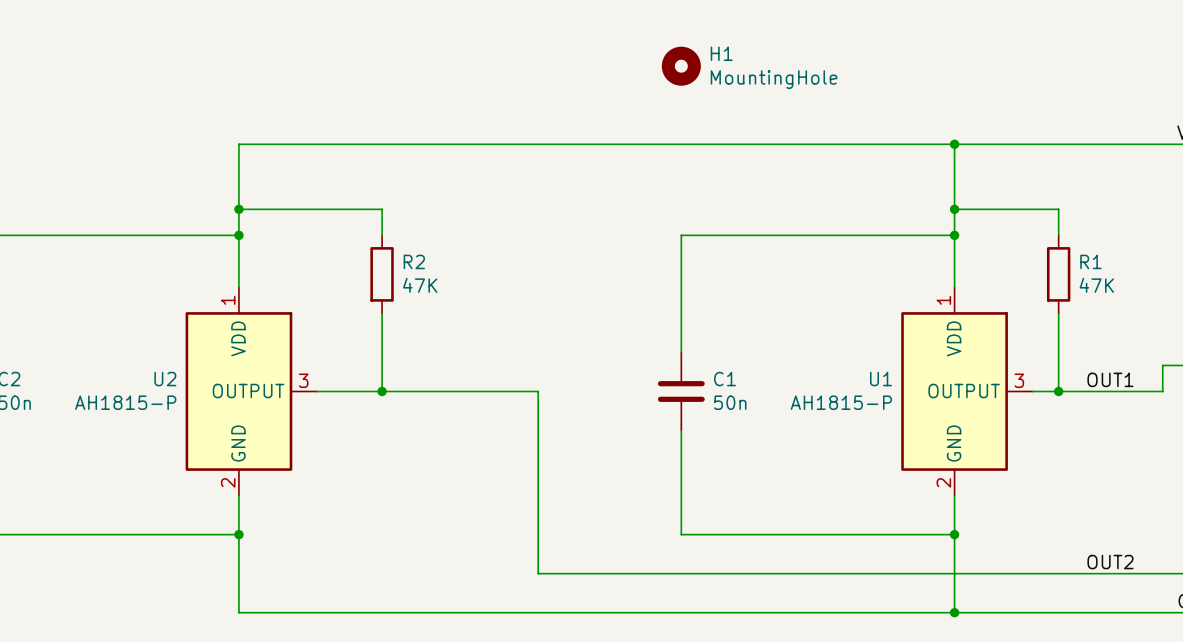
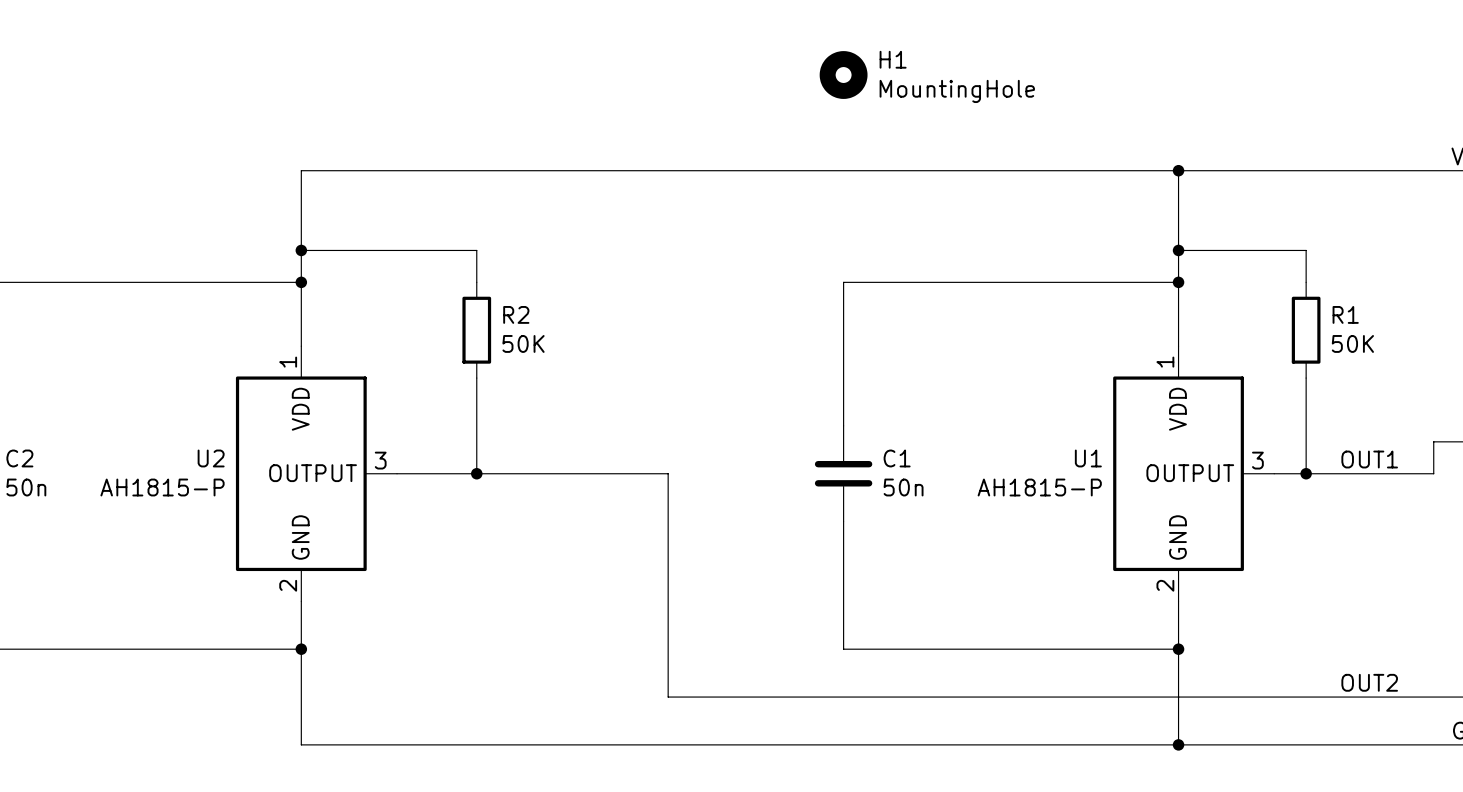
R2 value: 47K (420, 285) -> 50K (523, 343)
R1 value: 47K (1096, 285) -> 50K (1352, 343)

